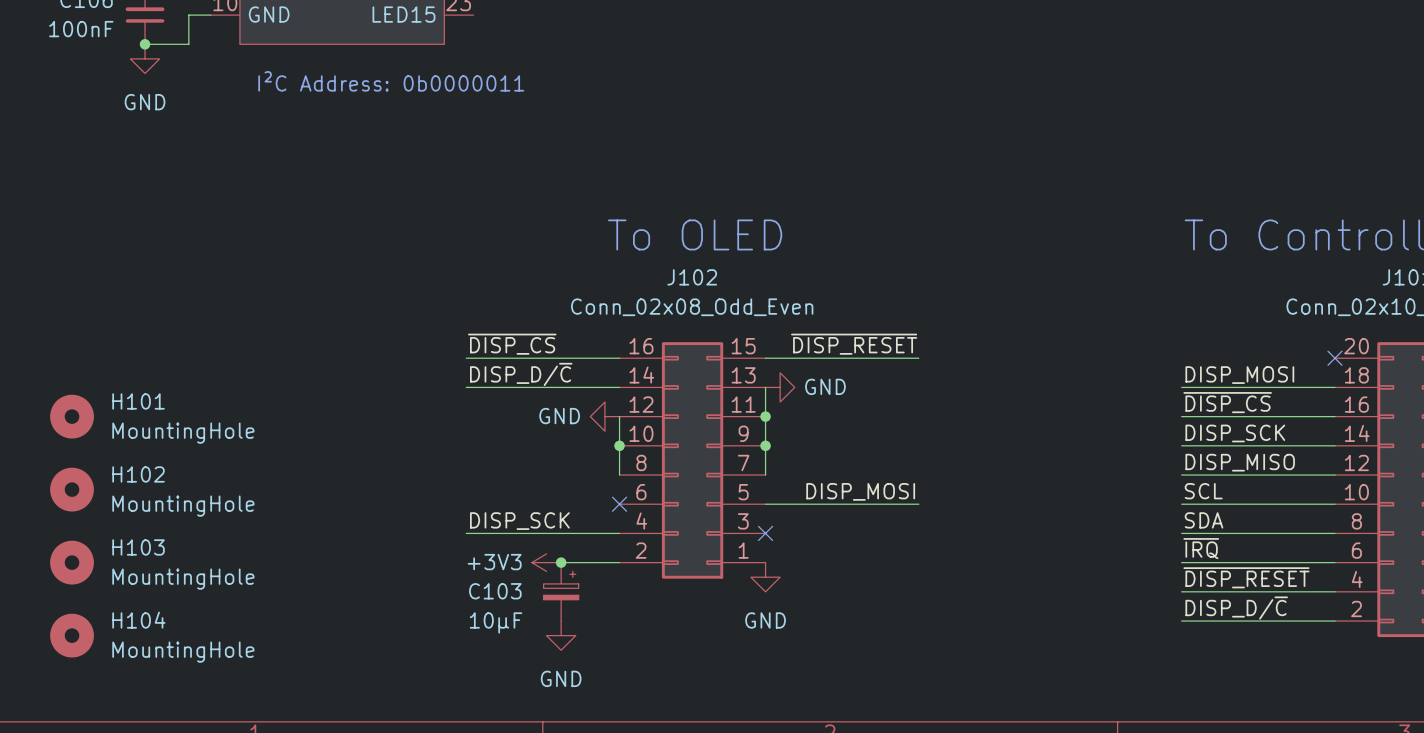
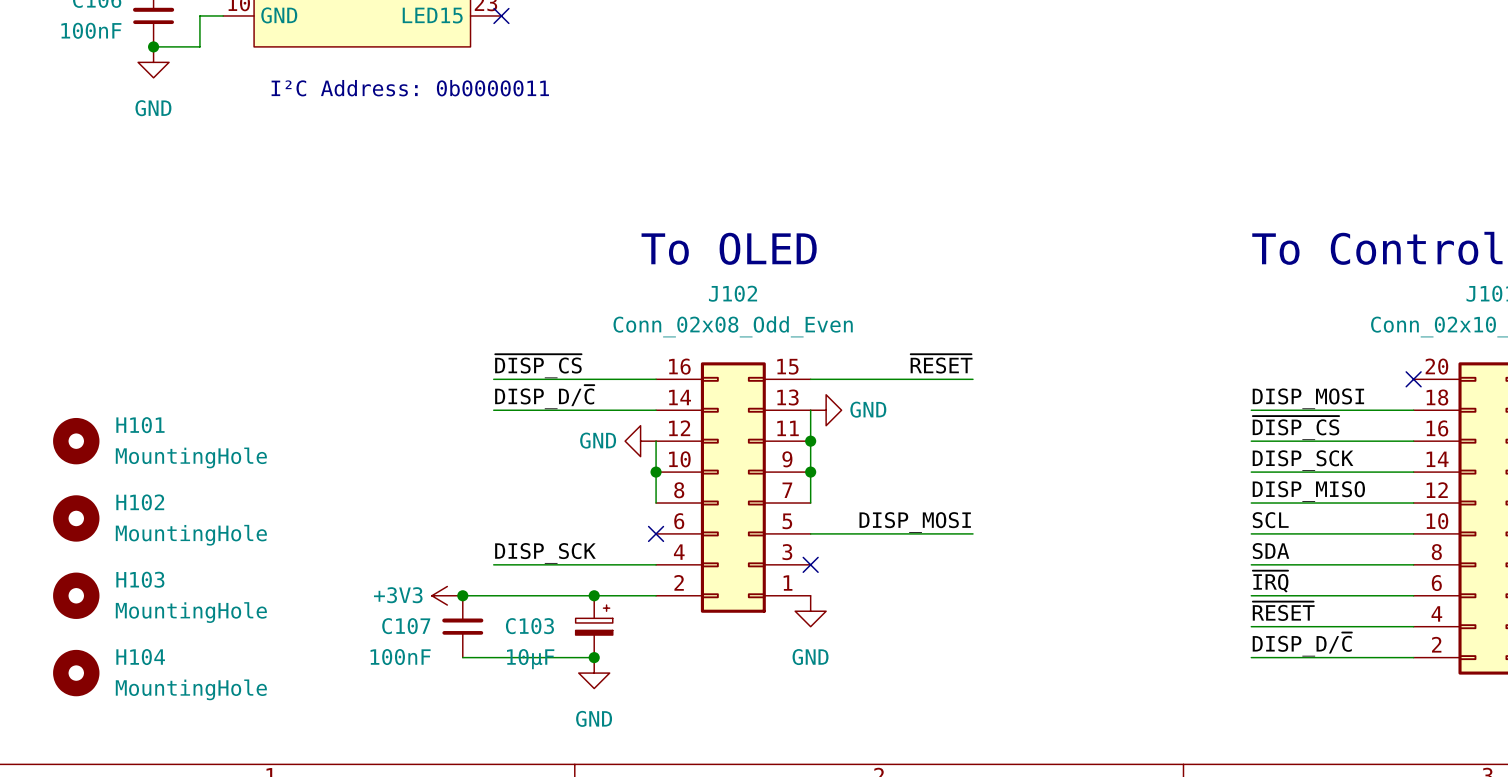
no-connect mark: none -> (501, 15)
label: ~{DISP_RESET} (854, 344) -> ~{RESET} (941, 363)
wire: none -> (462, 595) (594, 595)
junction: none -> (462, 595)
power symbol position: +3V3 (546, 562) -> +3V3 (447, 595)
label: ~{DISP_RESET} (1246, 577) -> ~{RESET} (1283, 611)
C107: none -> 100nF (462, 626)
wire: none -> (462, 657) (594, 657)
junction: none -> (594, 657)

